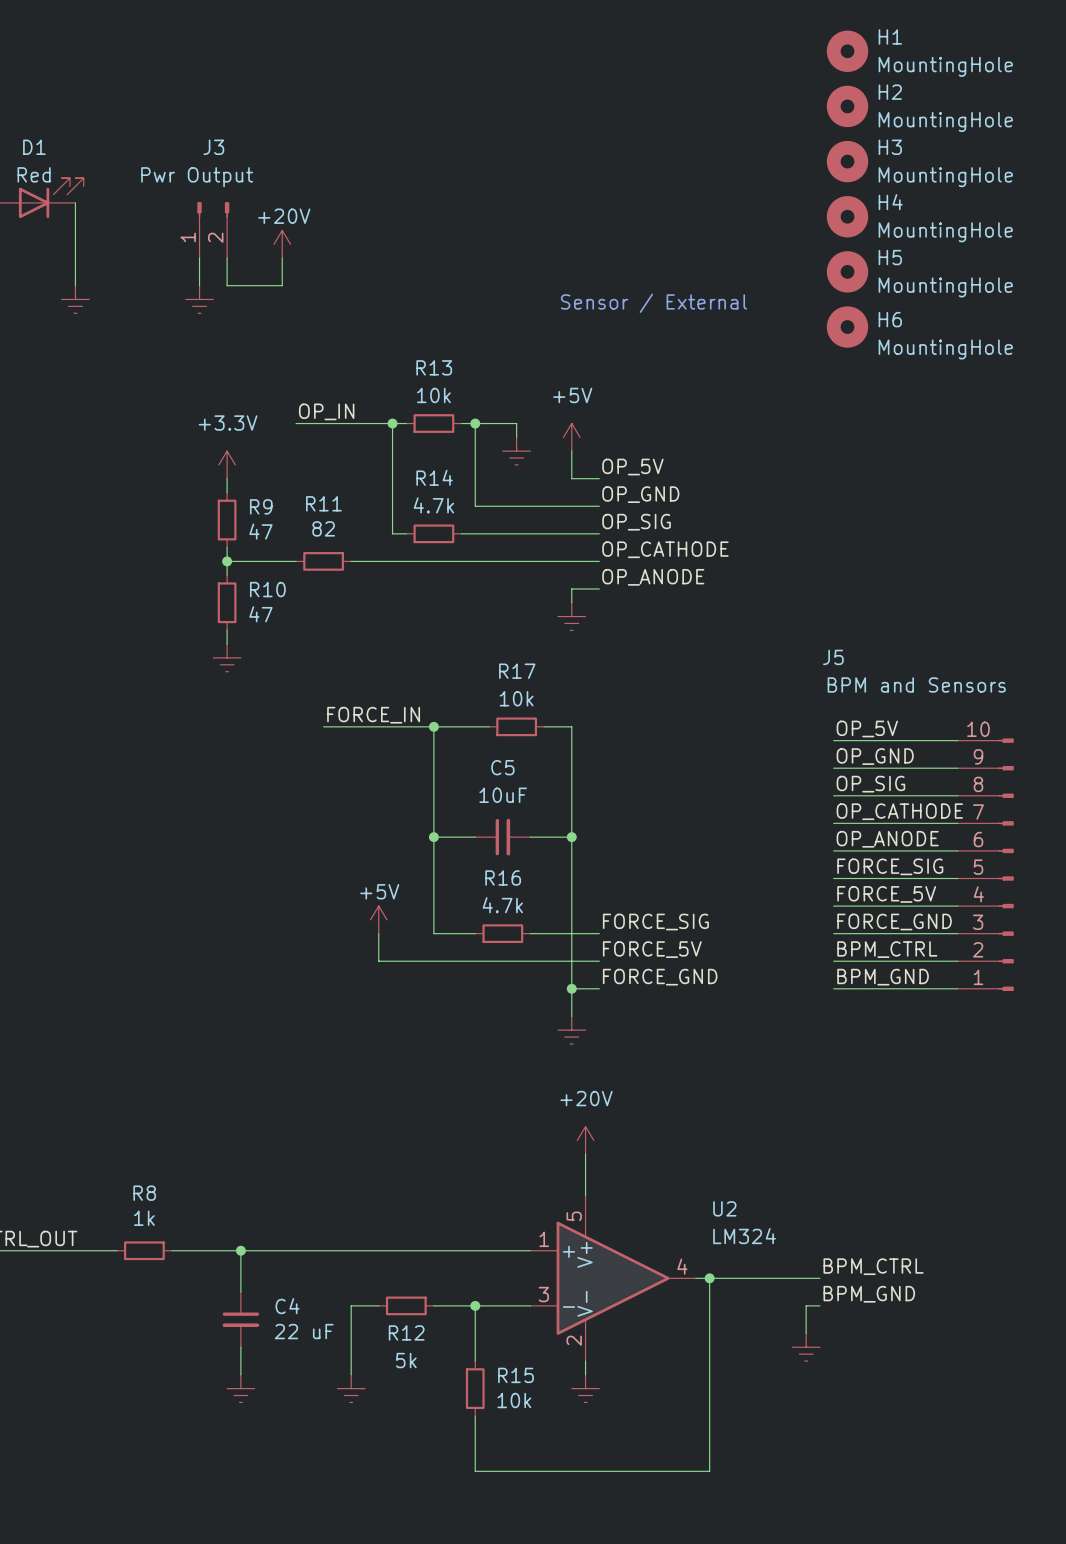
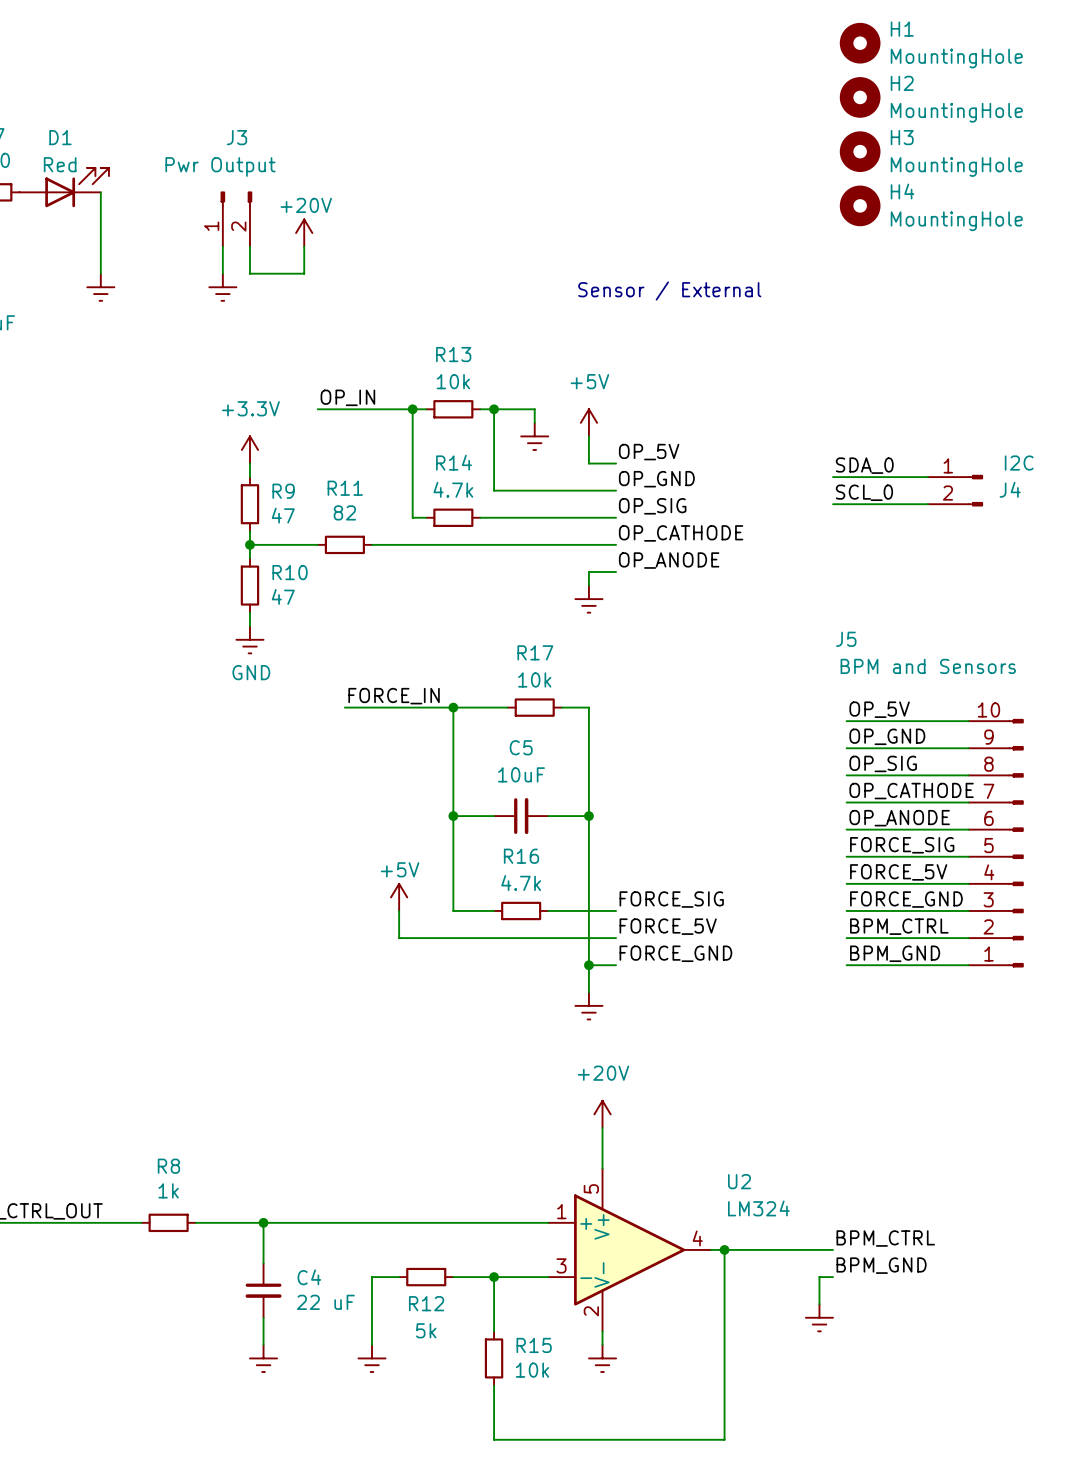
H5: MountingHole (847, 271) -> none
H6: MountingHole (847, 327) -> none
label: none -> SDA_0 (864, 465)
wire: none -> (833, 477) (927, 477)
J4: none -> I2C (955, 490)
label: none -> SCL_0 (864, 492)
wire: none -> (833, 504) (927, 504)
power symbol text: none -> GND (251, 672)

